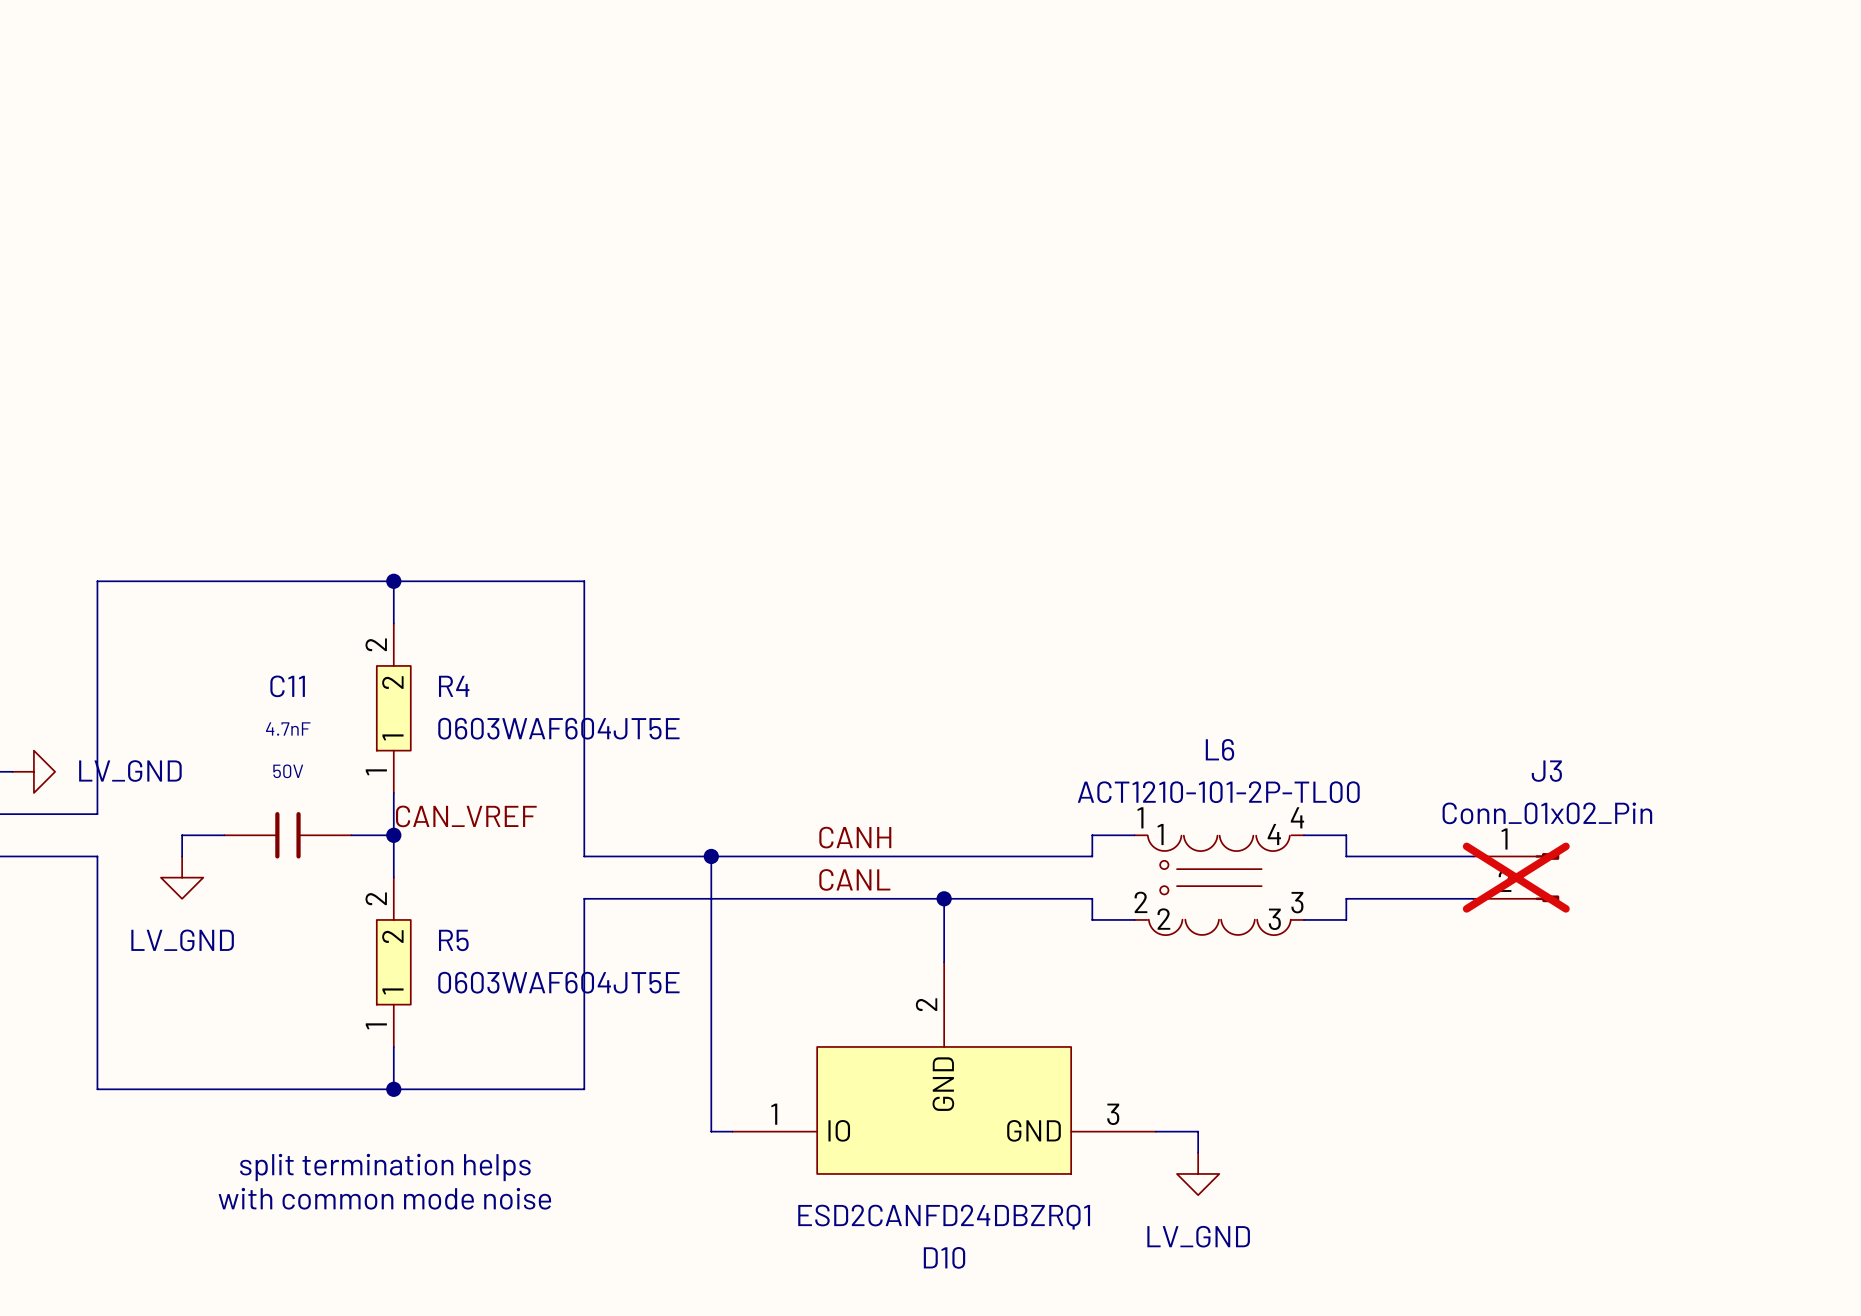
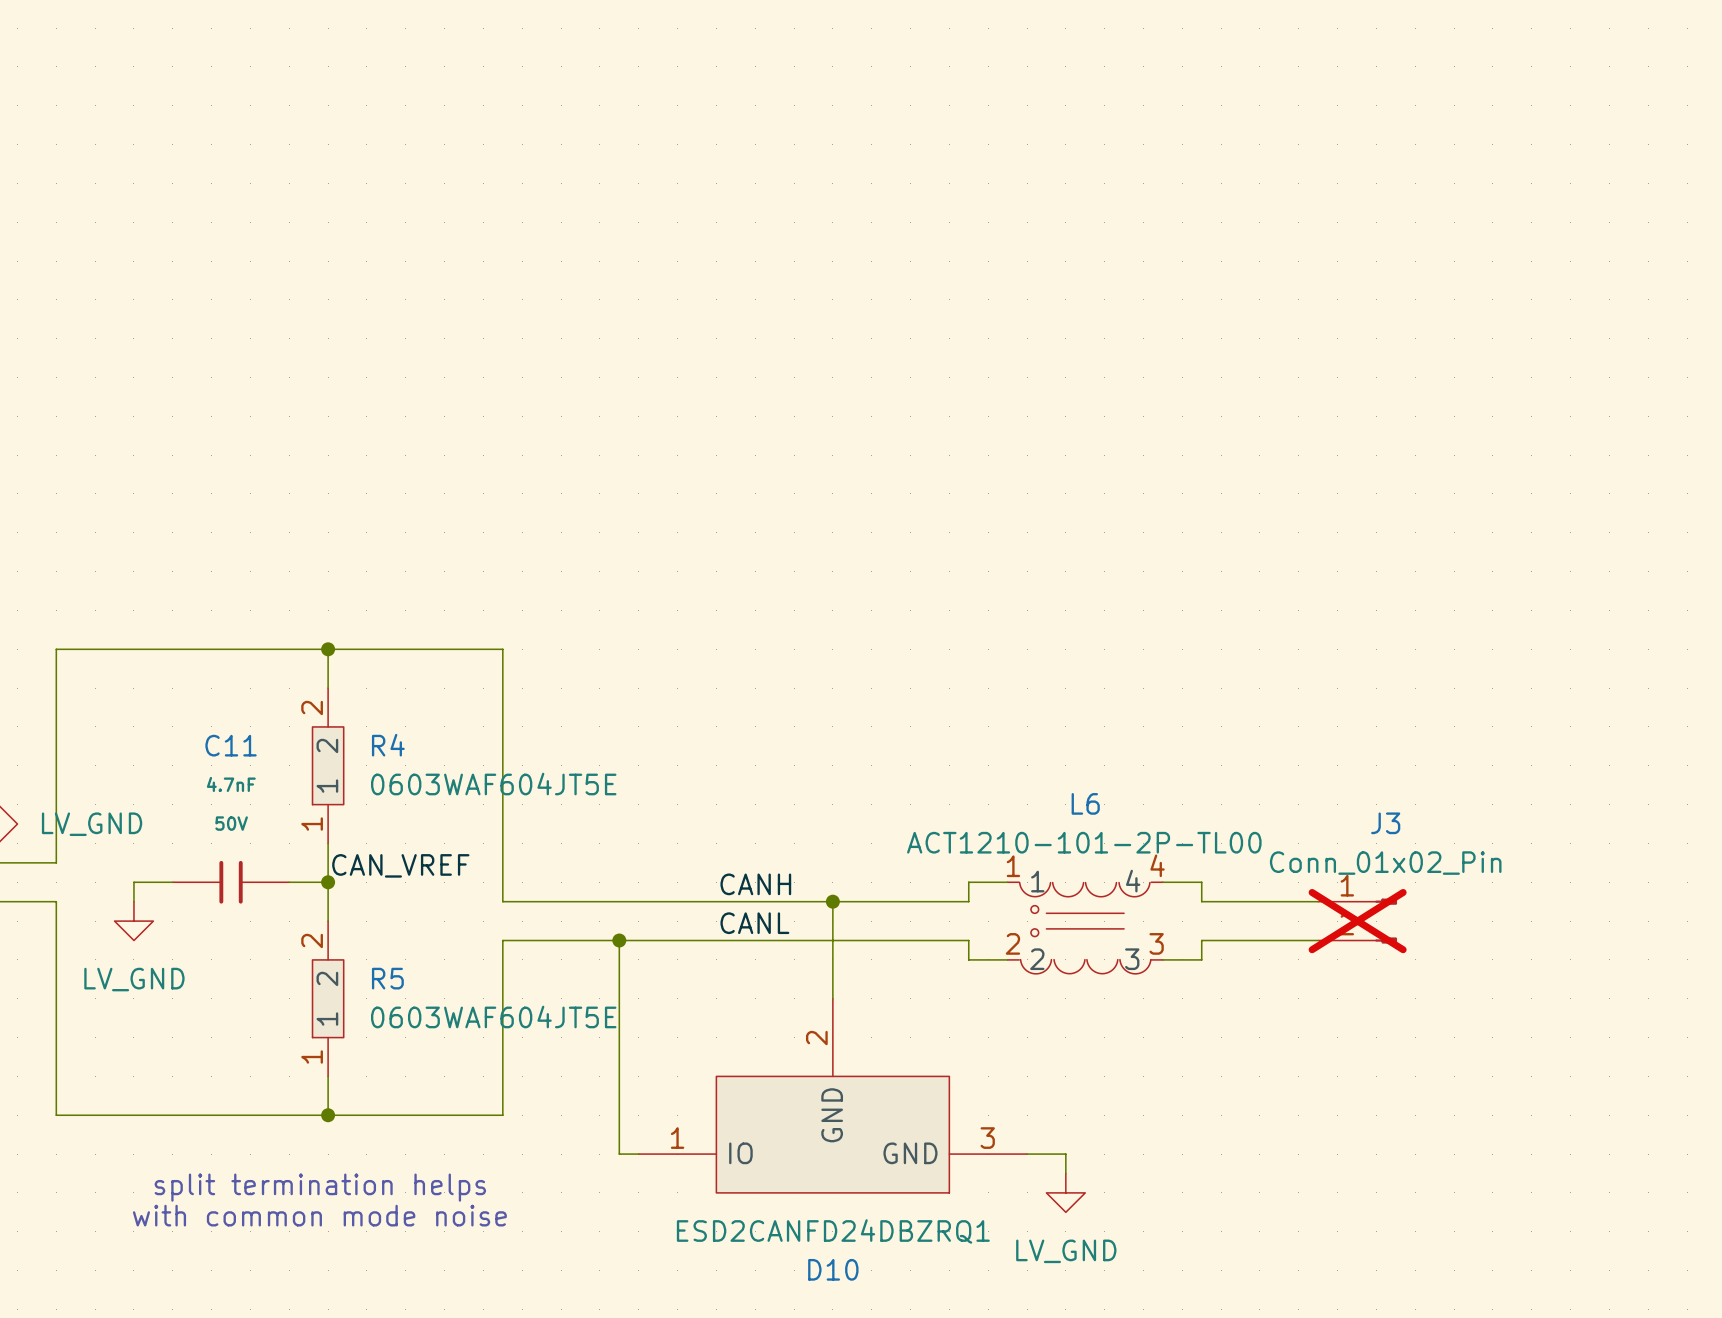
wire: (711, 856) (711, 898) -> (832, 901) (832, 940)
junction position: (711, 856) -> (619, 940)
junction position: (944, 898) -> (832, 901)

